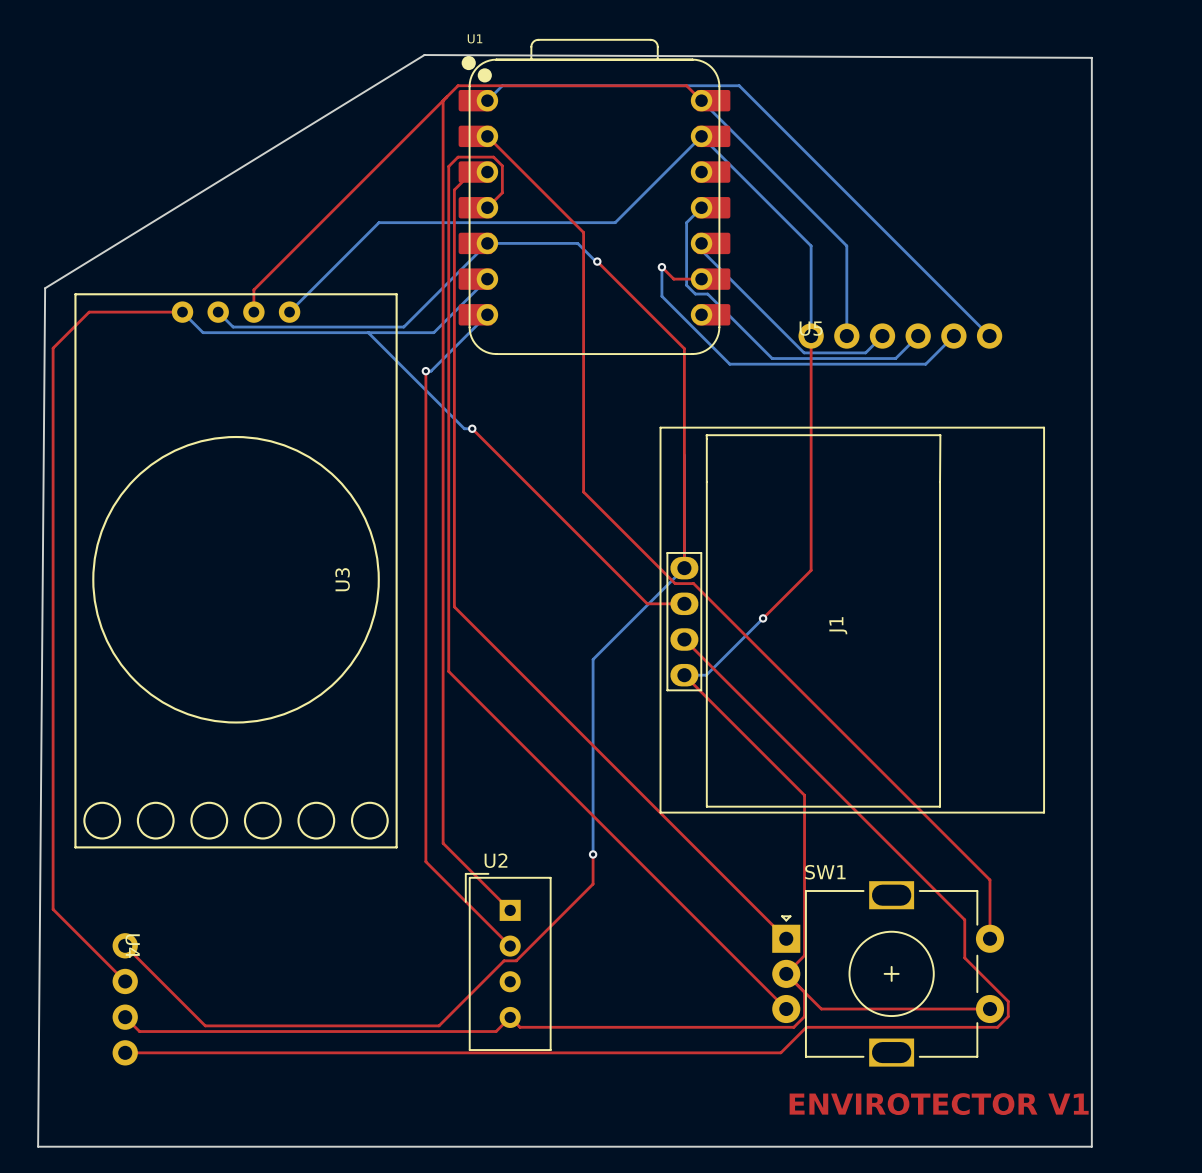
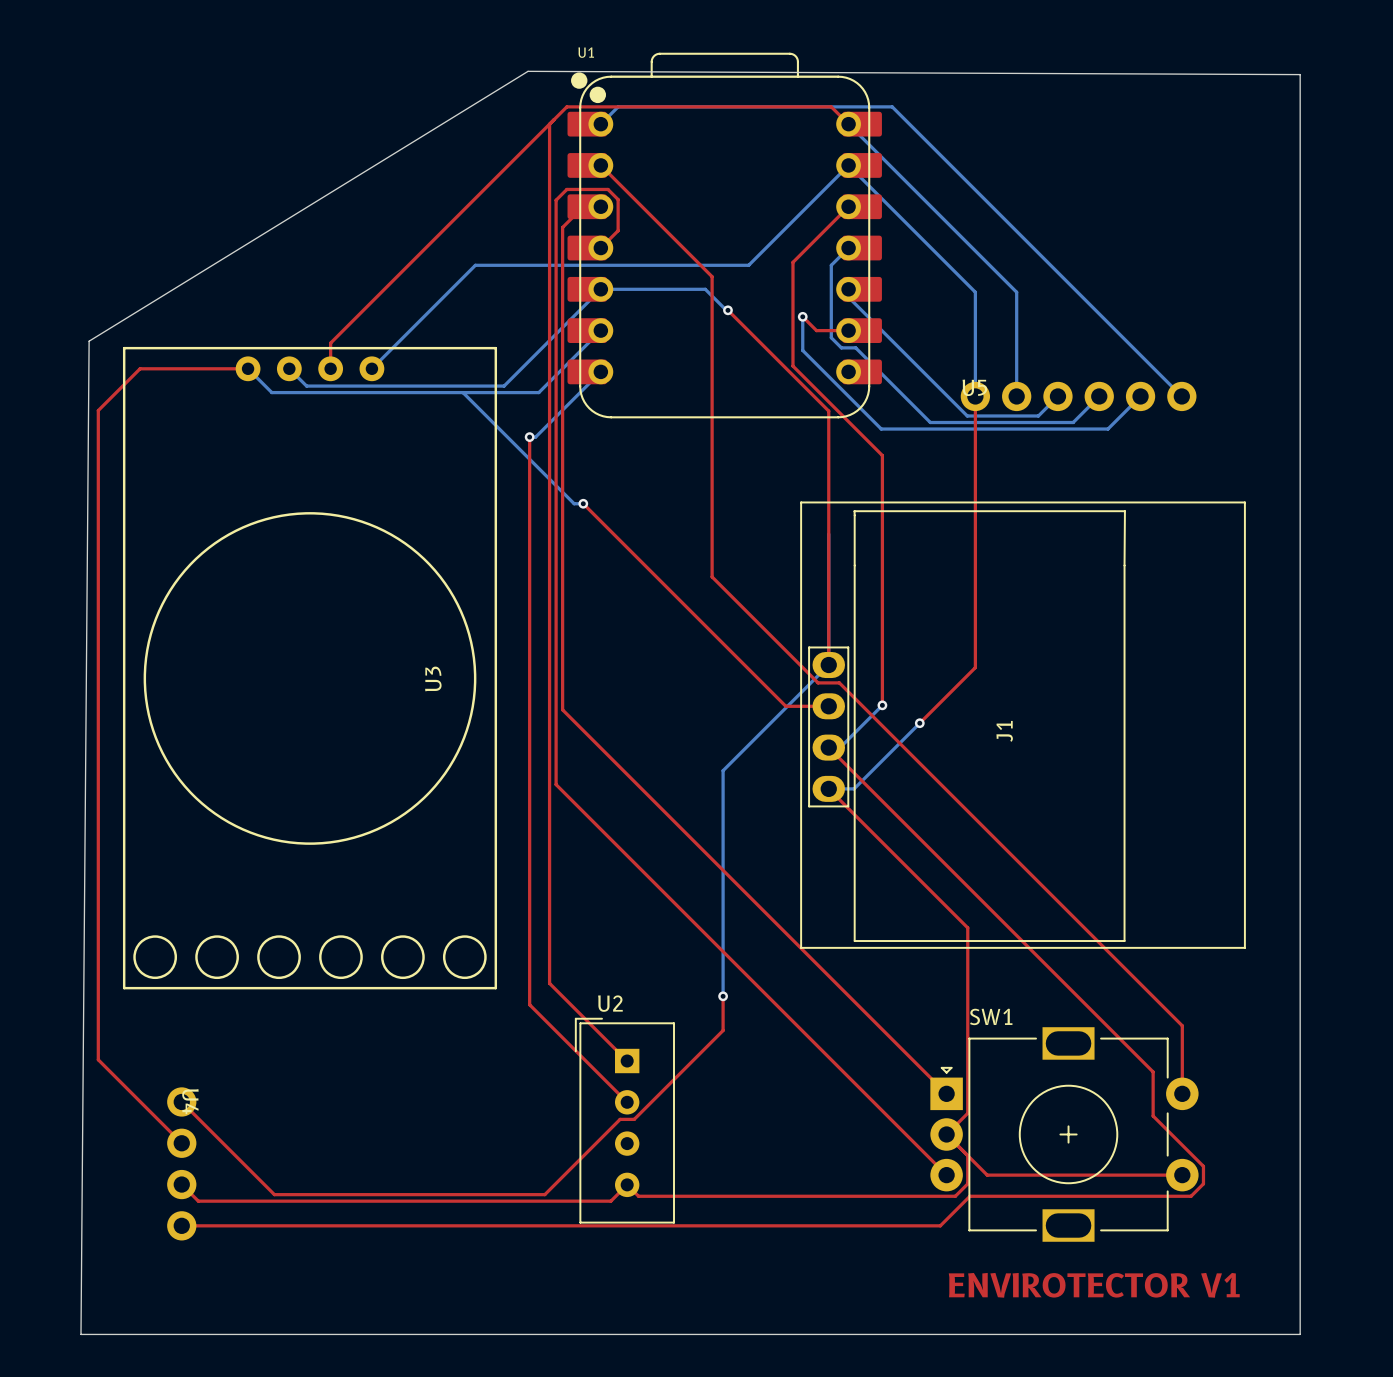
top track: none -> (848, 206) (792, 262) (792, 366) (882, 455) (882, 705)
bottom track: none -> (882, 705) (840, 747) (828, 747)
via: none -> (882, 705)

